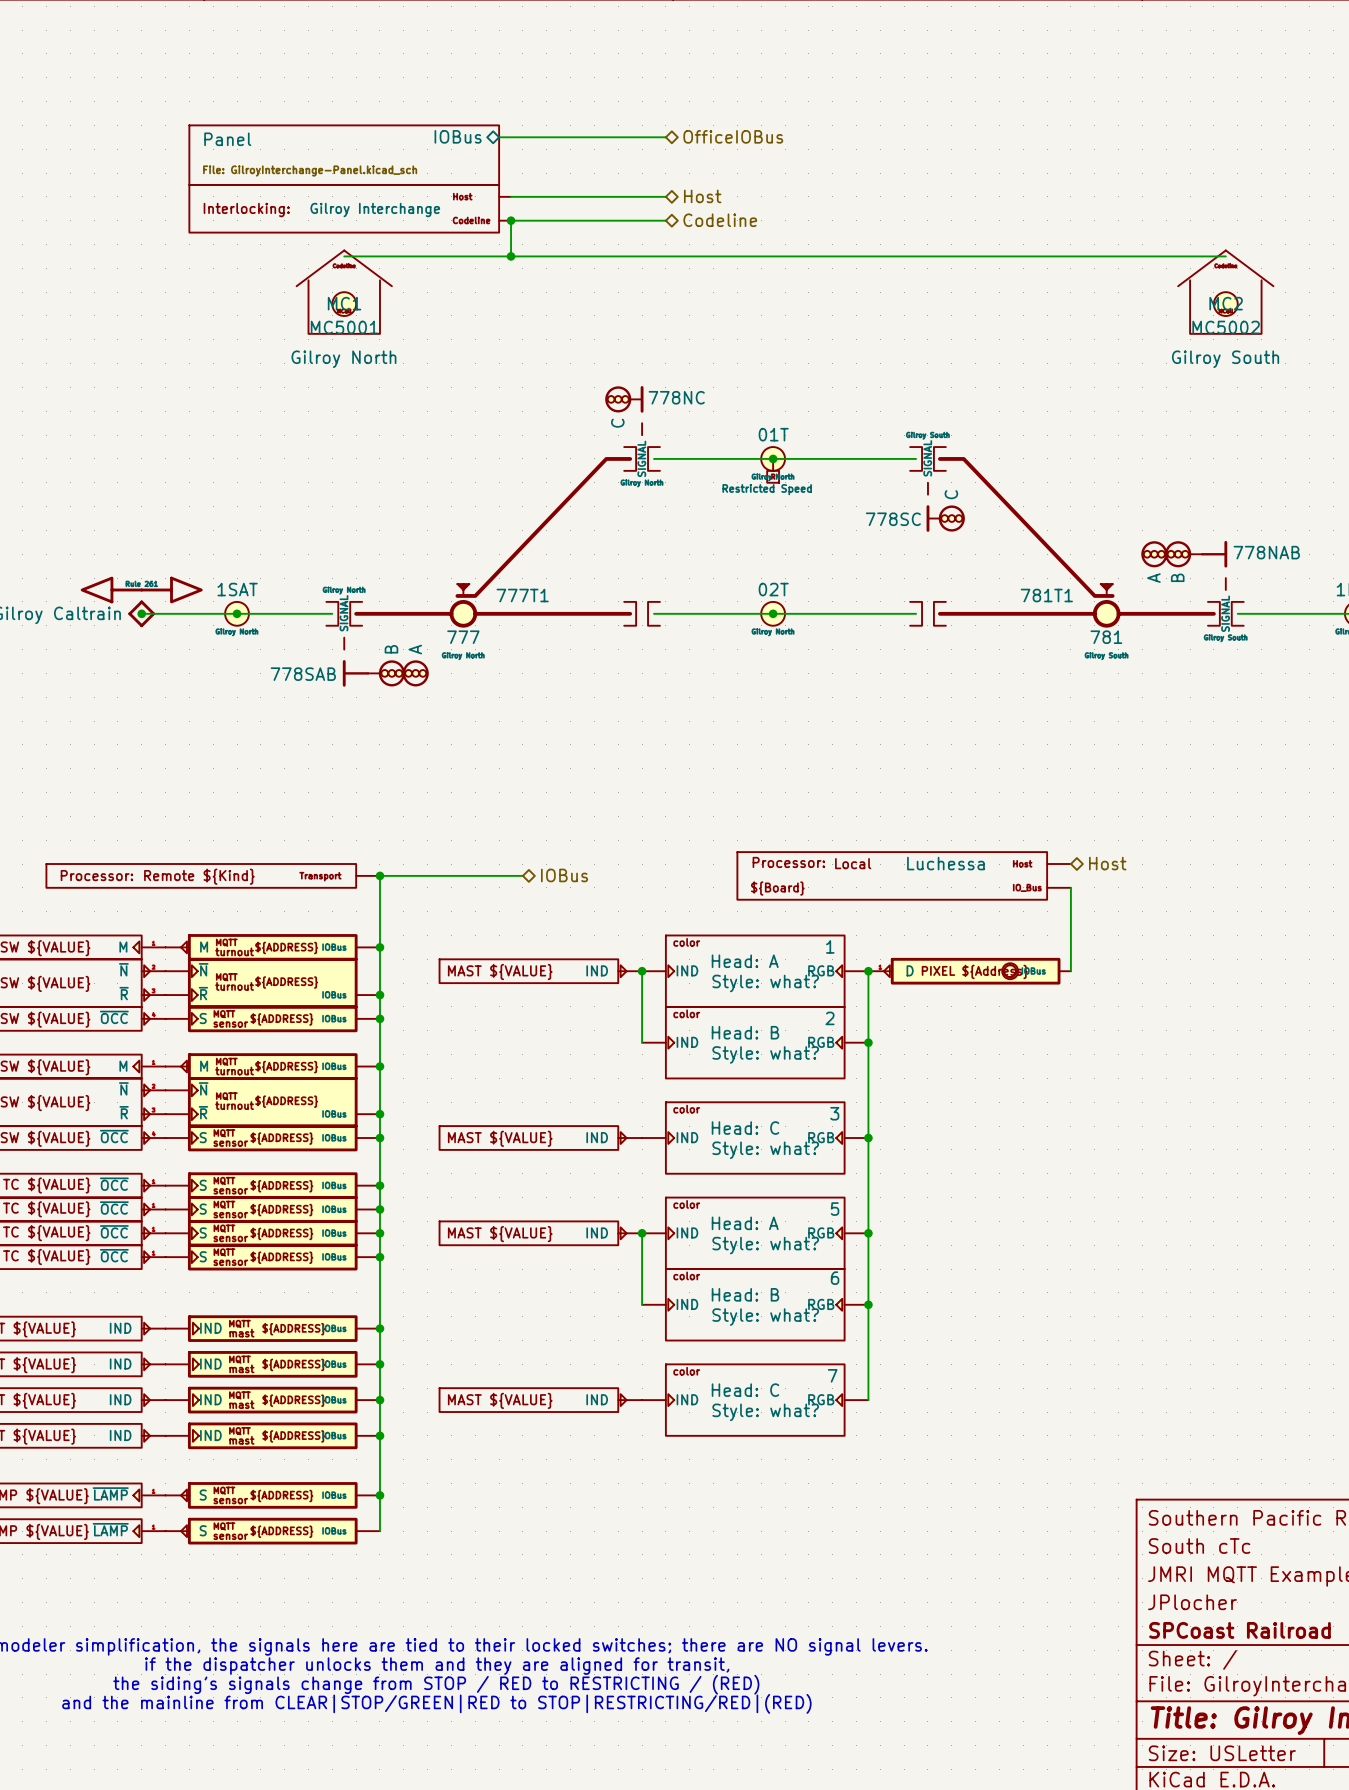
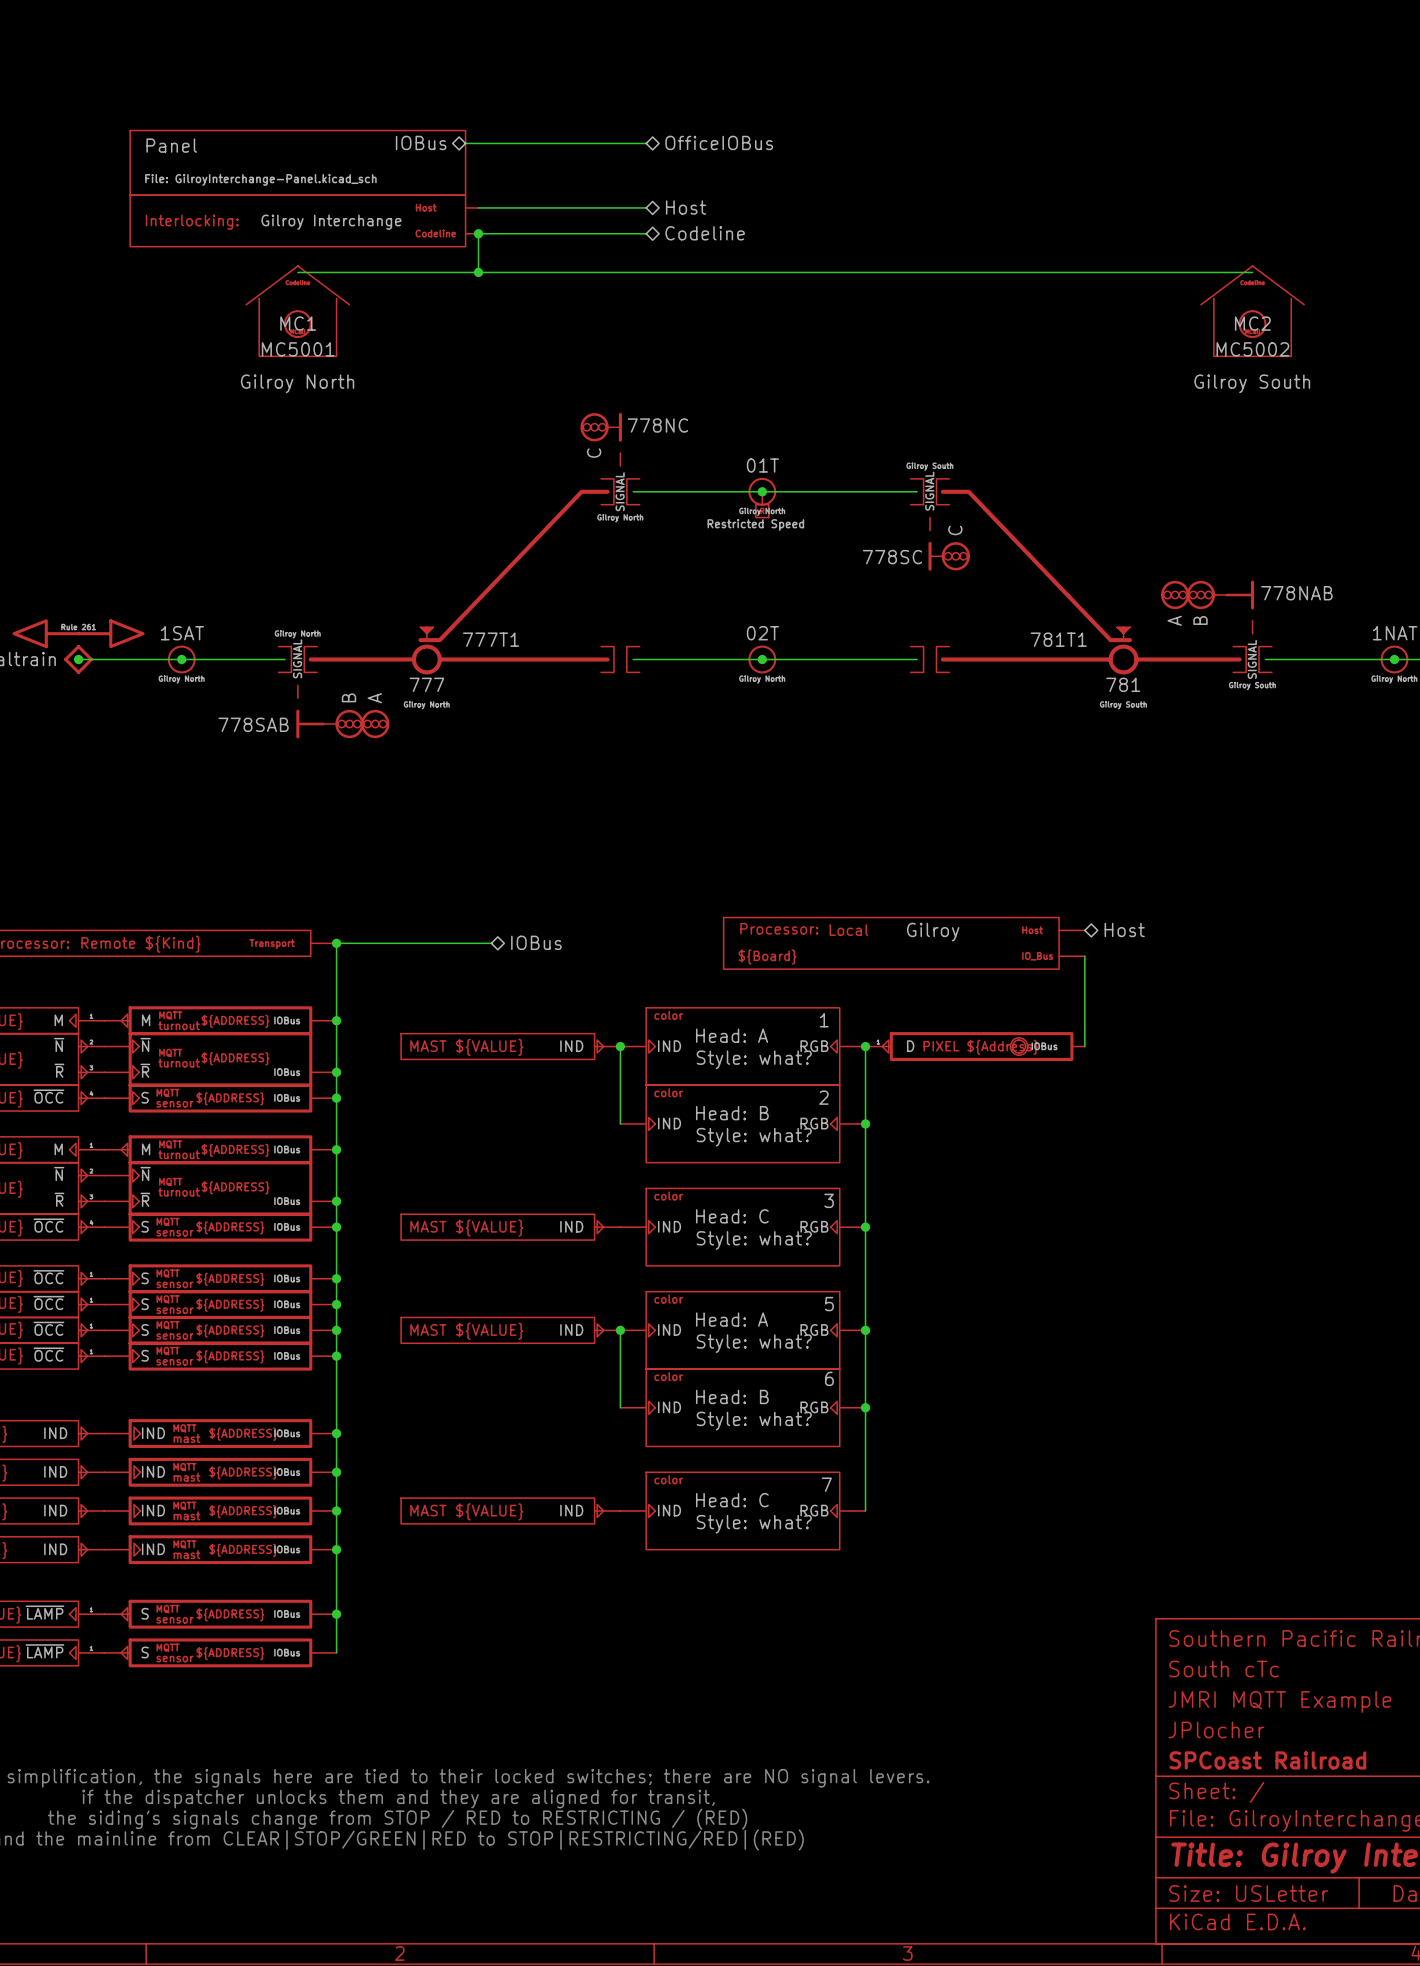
part value: Luchessa (945, 863) -> Gilroy (933, 932)

